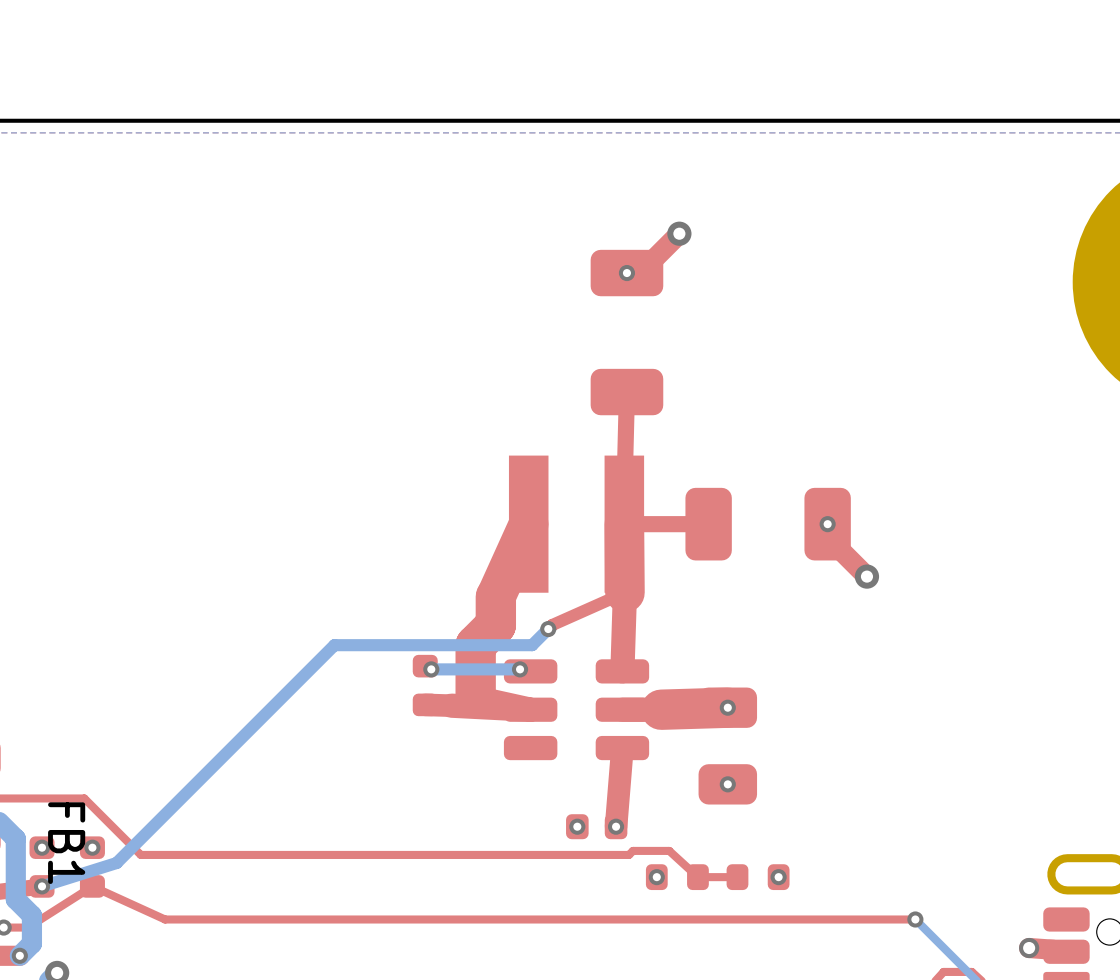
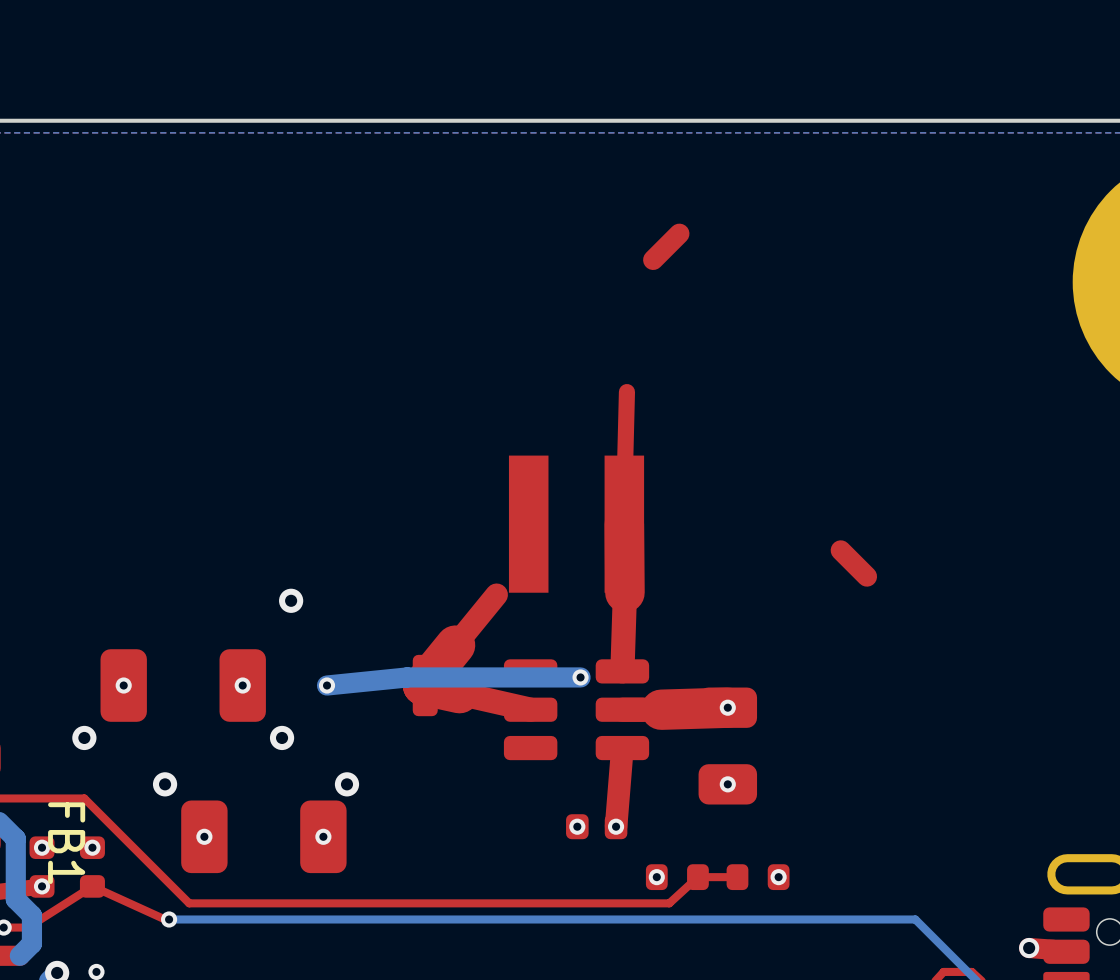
via: (679, 233) -> none
via: (626, 273) -> none
part: (626, 332) -> none
top track: (528, 524) (495, 596) (495, 625) (475, 645) (475, 697) (530, 709) (425, 704) -> none
top track: (708, 524) (624, 524) -> none
part: (768, 524) -> none
via: (827, 524) -> none
via: (866, 576) -> none
top track: (624, 592) (552, 625) (548, 629) -> none
top track: none -> (496, 594) (422, 685) (530, 709)
via: none -> (291, 600)
bottom track: (548, 629) (532, 645) (334, 645) (116, 863) (42, 886) -> none
via: (548, 629) -> none
via: (431, 669) -> none
bottom track: (520, 669) (431, 669) -> none
via: (520, 669) -> none
bottom track: none -> (580, 677) (407, 677) (327, 685)
via: none -> (580, 677)
via: none -> (123, 685)
part: none -> (183, 685)
via: none -> (242, 685)
via: none -> (327, 685)
via: none -> (84, 737)
via: none -> (282, 737)
via: none -> (165, 784)
via: none -> (346, 784)
via: none -> (204, 836)
part: none -> (263, 836)
via: none -> (323, 836)
top track: (140, 854) (628, 854) (633, 850) (669, 850) (697, 877) -> (140, 854) (189, 903) (669, 903) (697, 877)
via: none -> (169, 919)
top track: (915, 919) (169, 919) -> none
bottom track: none -> (915, 919) (169, 919)
via: (915, 919) -> none
via: (19, 955) -> none
via: none -> (96, 971)

